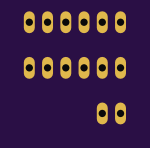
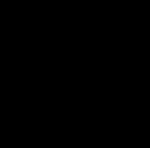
part: (74, 22) -> none
part: (74, 67) -> none
part: (111, 113) -> none

